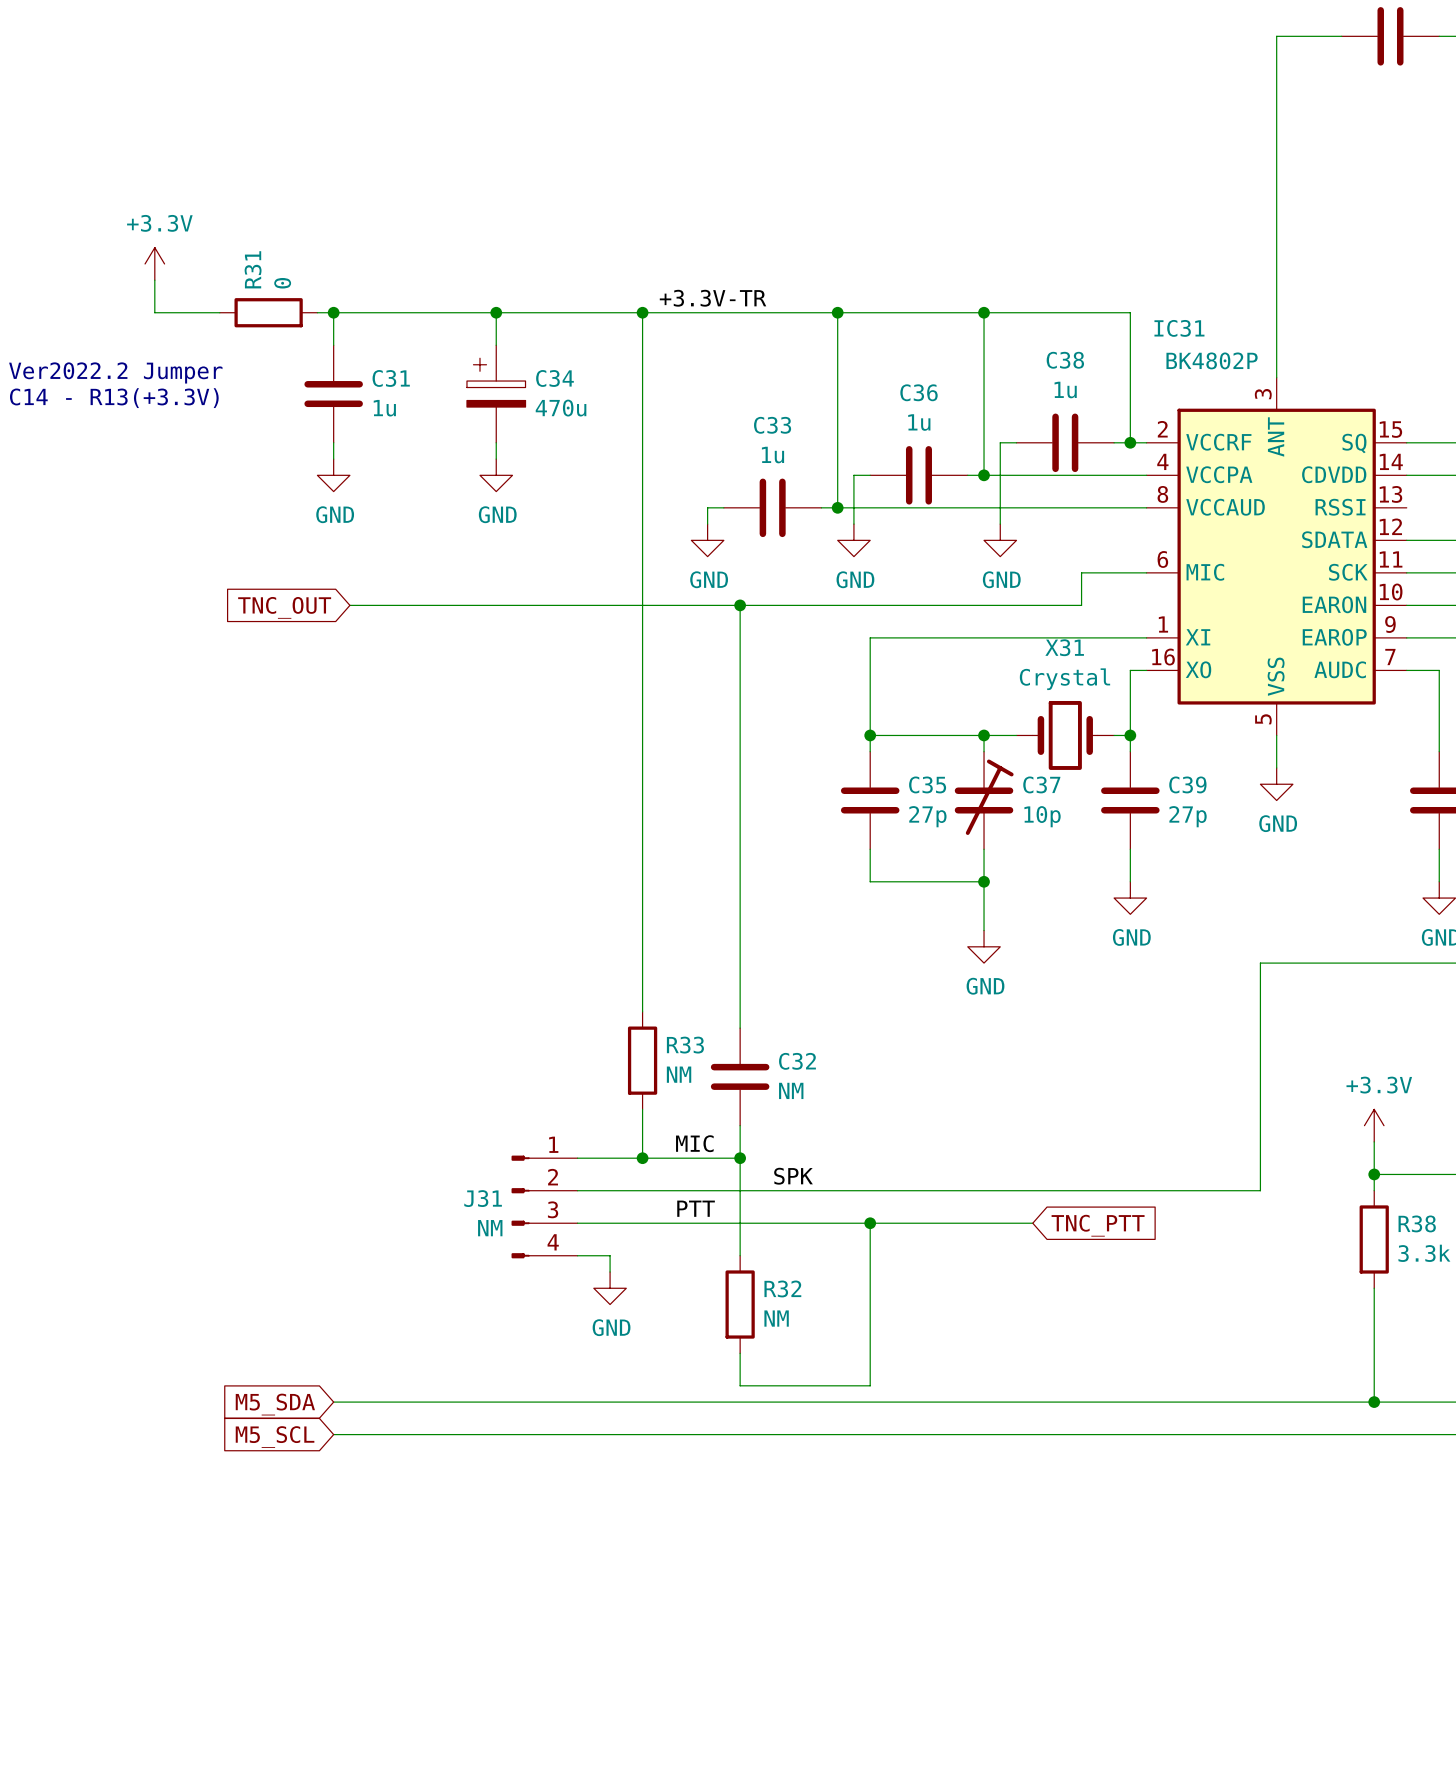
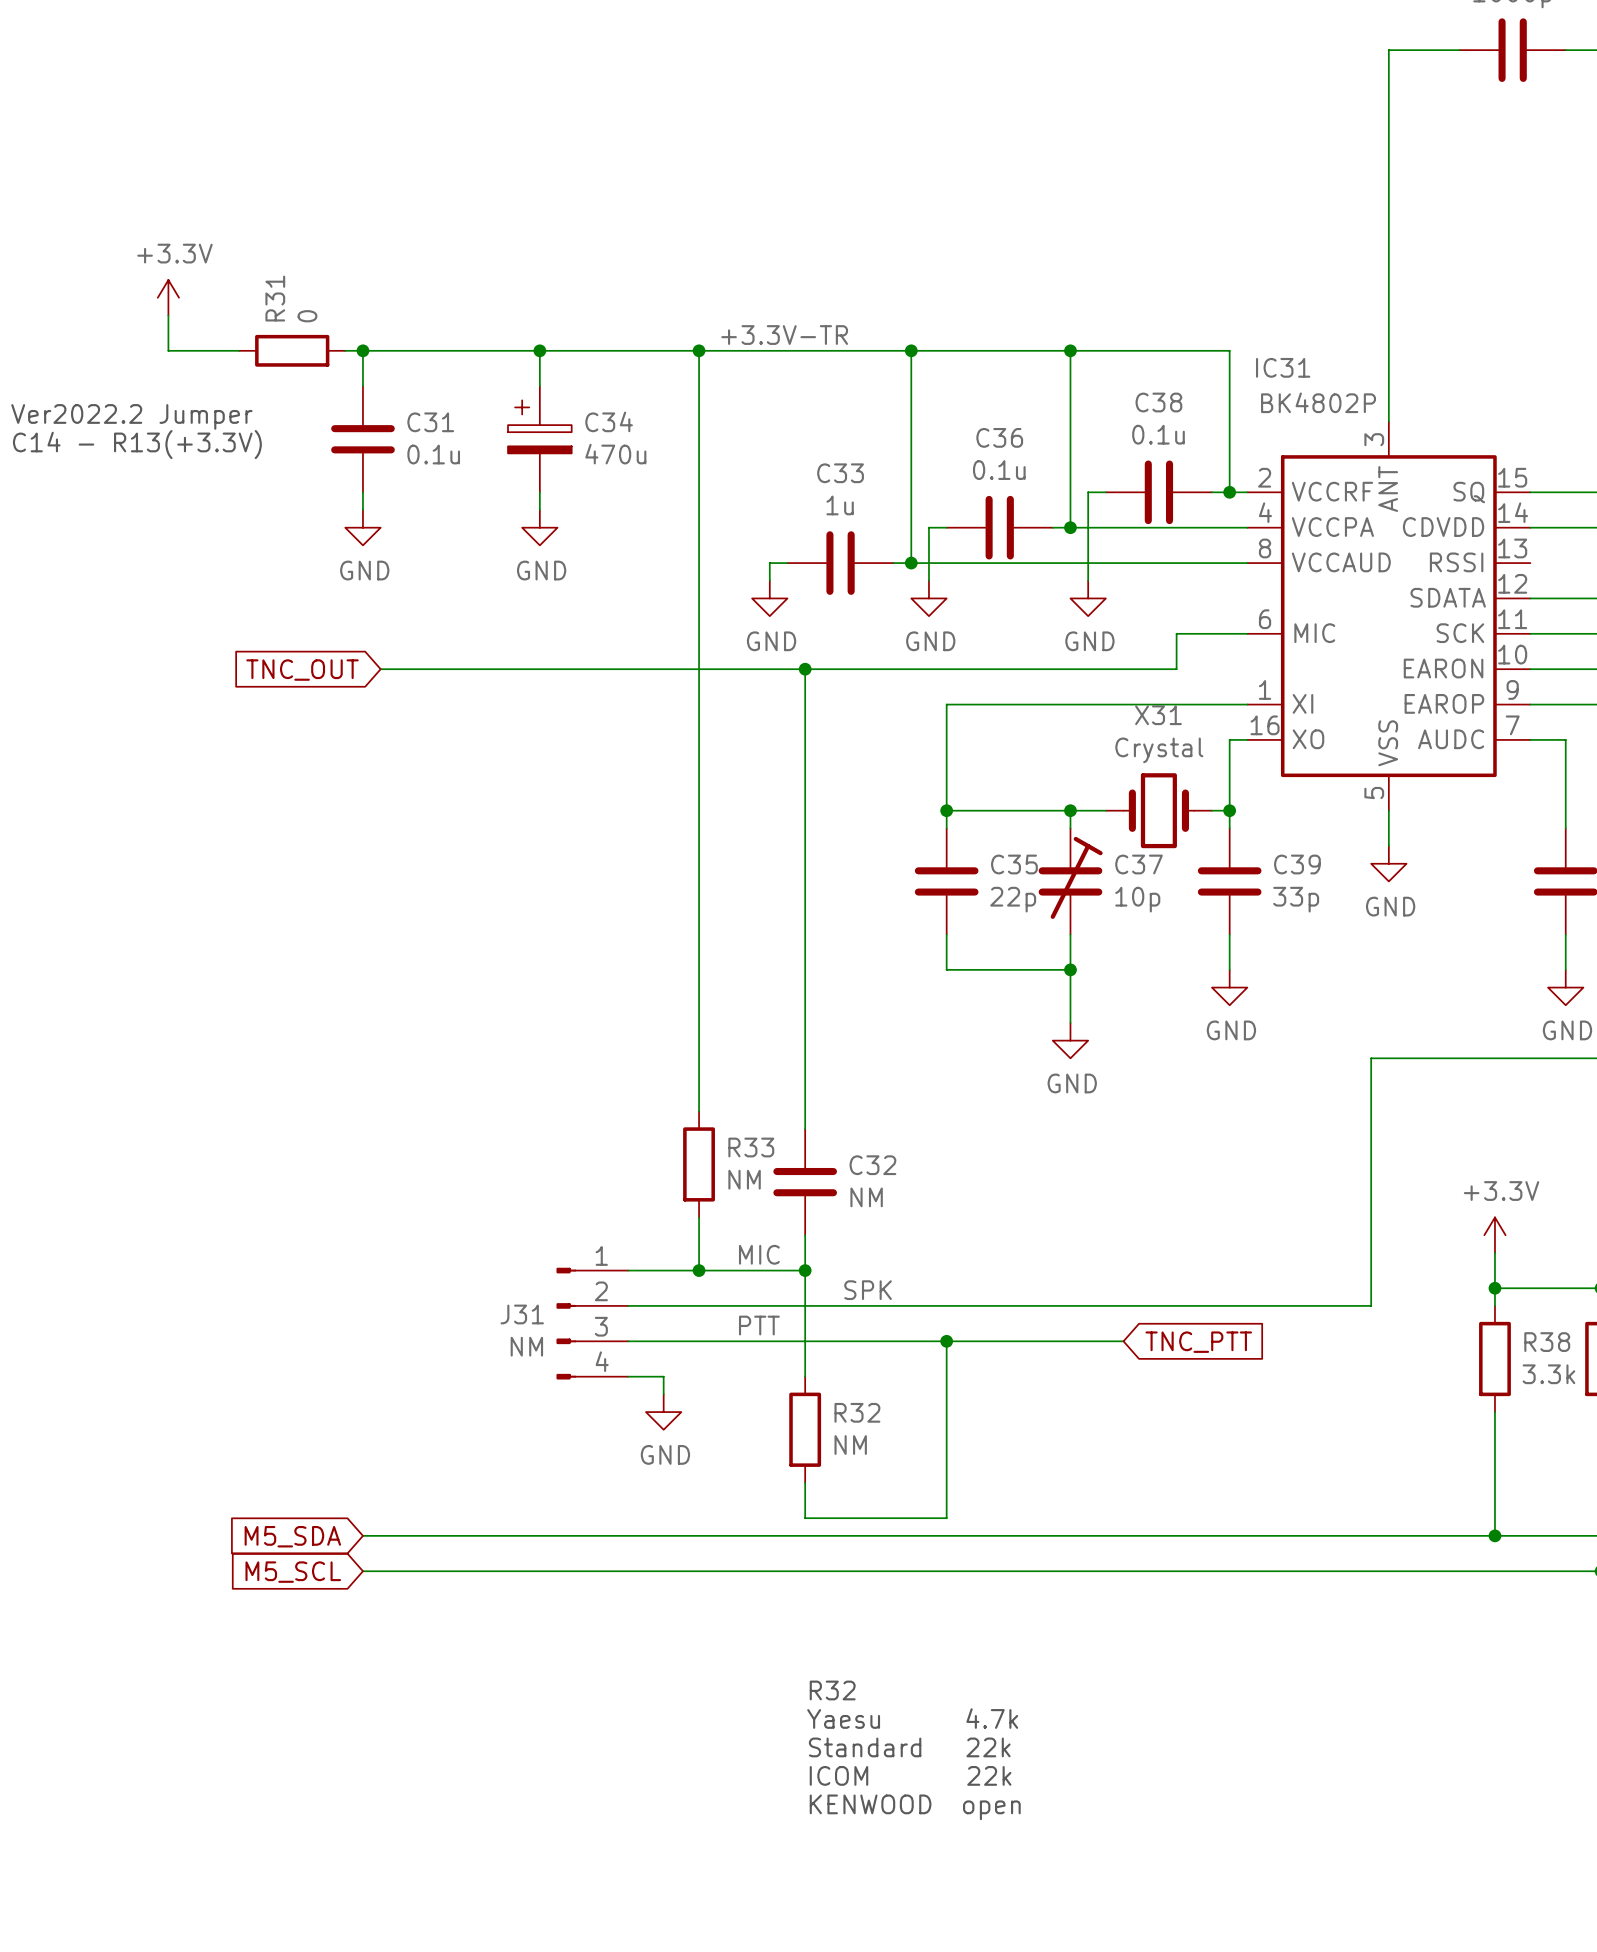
C38 value: 1u (1065, 390) -> 0.1u (1158, 434)
C31 value: 1u (384, 408) -> 0.1u (433, 454)
C36 value: 1u (919, 422) -> 0.1u (999, 470)
C35 value: 27p (927, 816) -> 22p (1013, 899)
C39 value: 27p (1188, 816) -> 33p (1296, 899)
text: none -> R32 (832, 1690)
text: none -> Yaesu 4.7k (912, 1718)
text: none -> Standard 22k (909, 1747)
text: none -> ICOM 22k (910, 1775)
text: none -> KENWOOD open (915, 1807)

